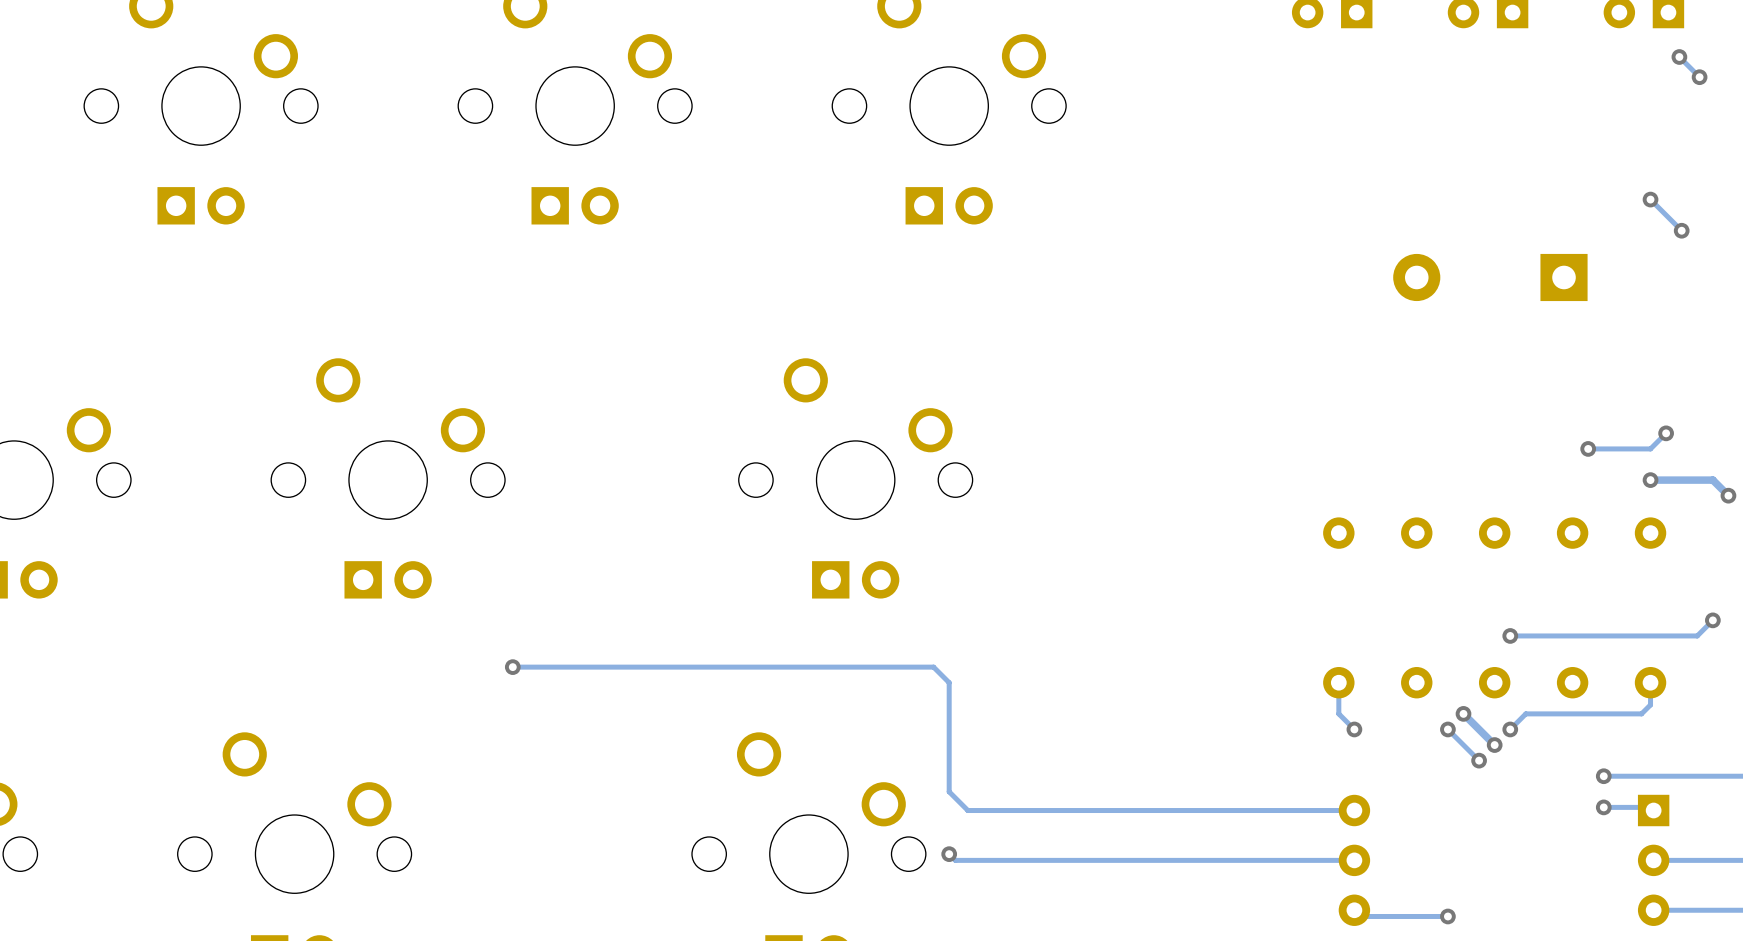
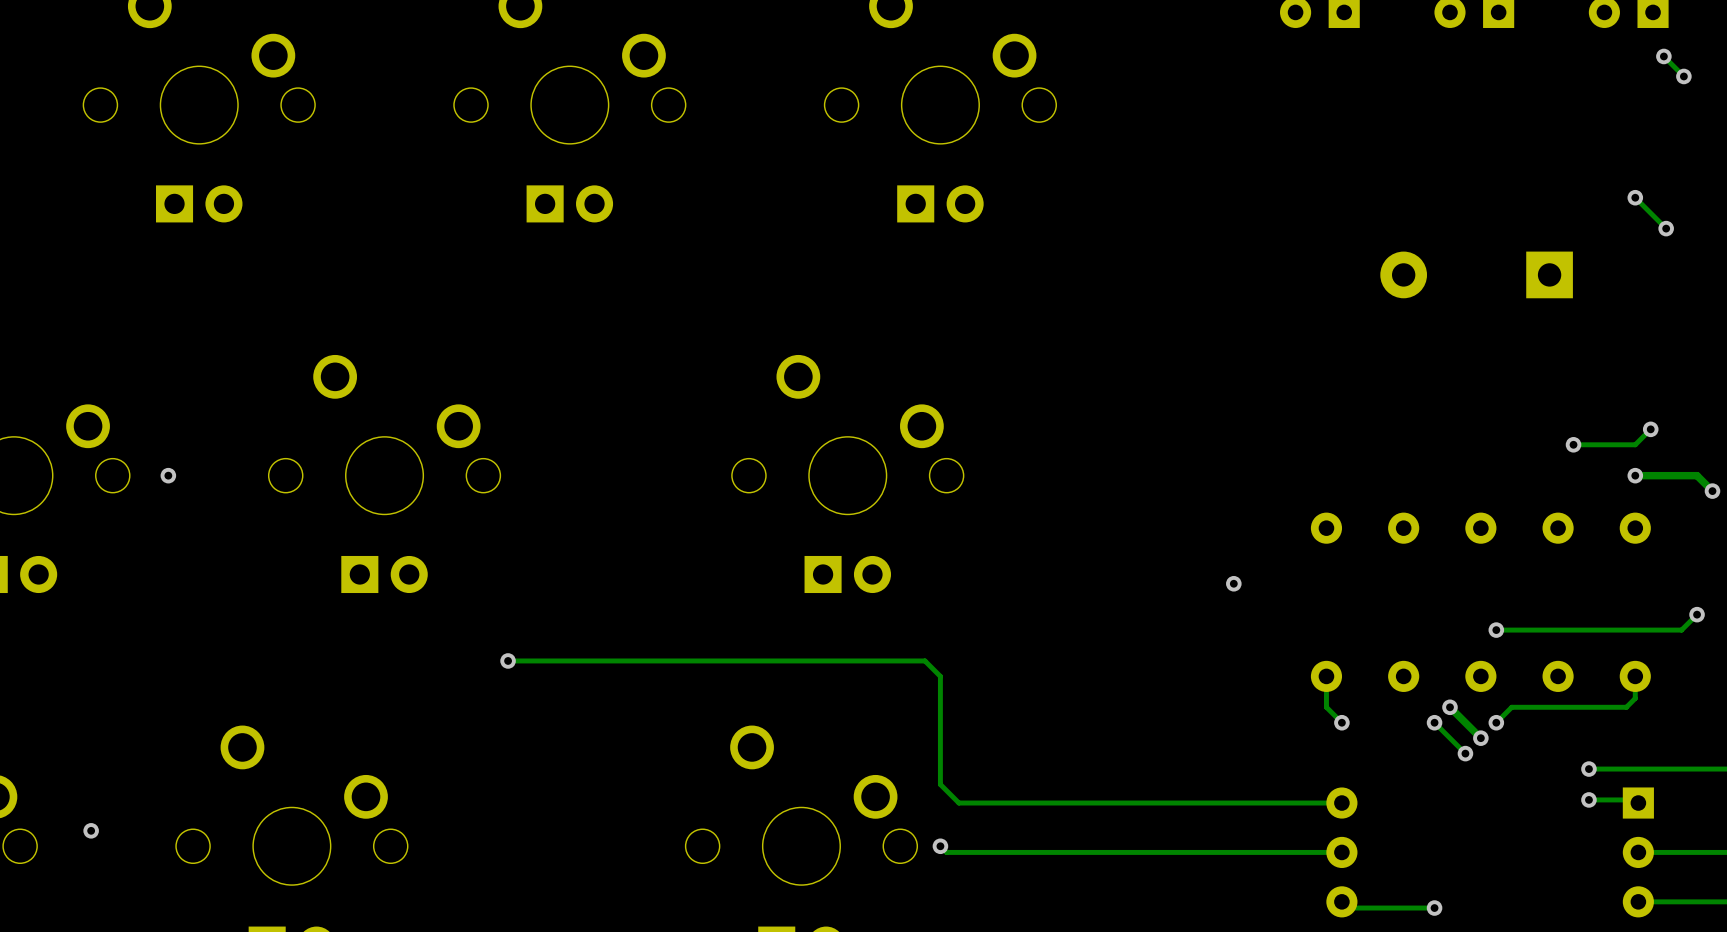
via: none -> (168, 475)
via: none -> (1233, 583)
via: none -> (91, 830)

